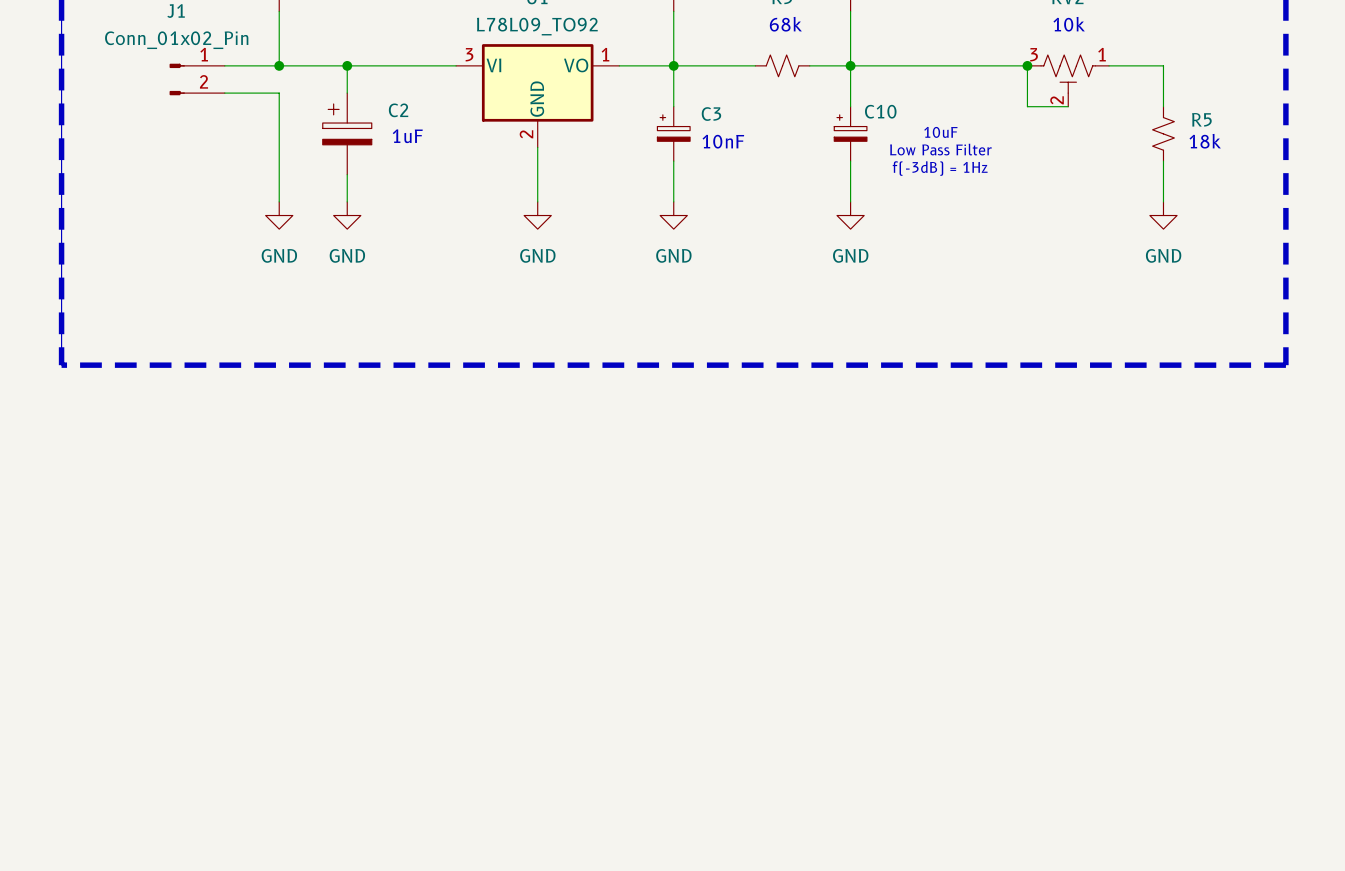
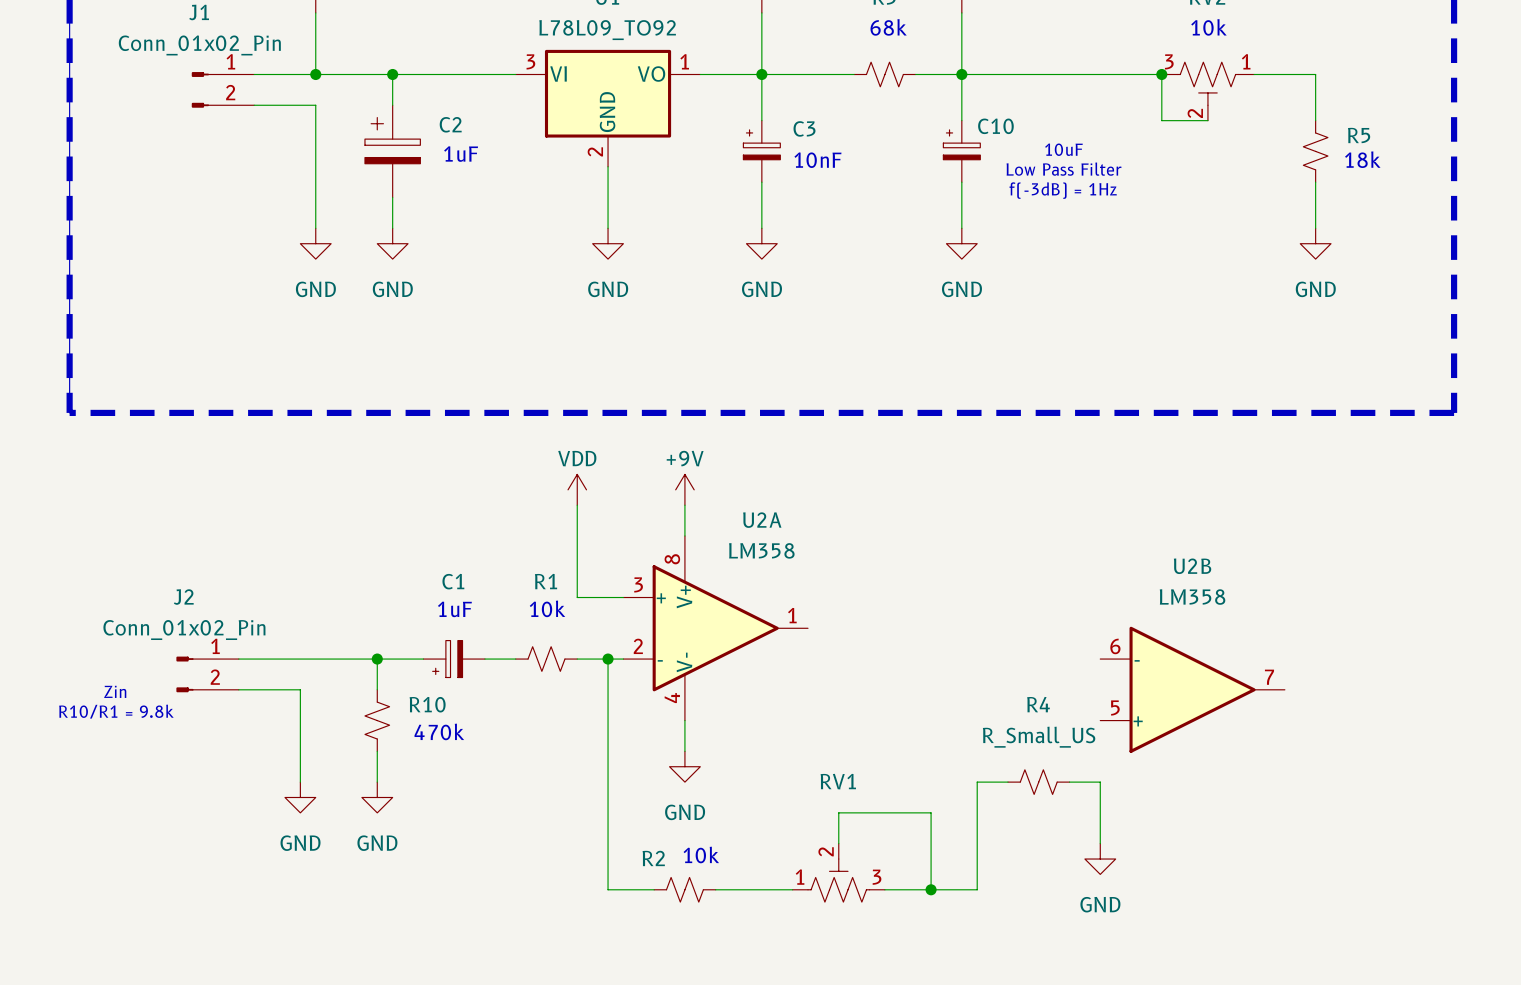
power symbol: none -> VDD (577, 489)
power symbol: none -> +9V (684, 489)
wire: none -> (577, 505) (577, 597) (623, 597)
wire: none -> (684, 505) (684, 535)
text: none -> 1uF (454, 609)
text: none -> 10k (547, 608)
part: none -> (684, 628)
U2A: none -> LM358 (715, 628)
wire: none -> (238, 659) (423, 659)
wire: none -> (377, 659) (377, 689)
junction: none -> (377, 659)
C1: none -> (454, 659)
wire: none -> (484, 659) (515, 659)
R1: none -> (546, 659)
wire: none -> (577, 659) (623, 659)
wire: none -> (608, 659) (608, 889) (654, 889)
junction: none -> (608, 659)
J2: none -> Conn_01x02_Pin (207, 674)
wire: none -> (238, 689) (300, 689) (300, 782)
U2B: none -> LM358 (1192, 689)
text: none -> Zin (115, 691)
text: none -> R10/R1 = 9.8k (116, 711)
R10: none -> (377, 720)
wire: none -> (684, 720) (684, 751)
text: none -> 470k (439, 731)
wire: none -> (377, 751) (377, 782)
power symbol: none -> GND (684, 766)
wire: none -> (1007, 782) (977, 782) (977, 889) (884, 889)
R4: none -> R_Small_US (1038, 782)
wire: none -> (1069, 782) (1100, 782) (1100, 843)
power symbol: none -> GND (300, 797)
power symbol: none -> GND (377, 797)
wire: none -> (838, 843) (838, 812) (931, 812) (931, 889)
text: none -> 10k (701, 855)
power symbol: none -> GND (1100, 859)
RV1: none -> (838, 872)
R2: none -> (684, 889)
wire: none -> (715, 889) (792, 889)
junction: none -> (931, 889)

